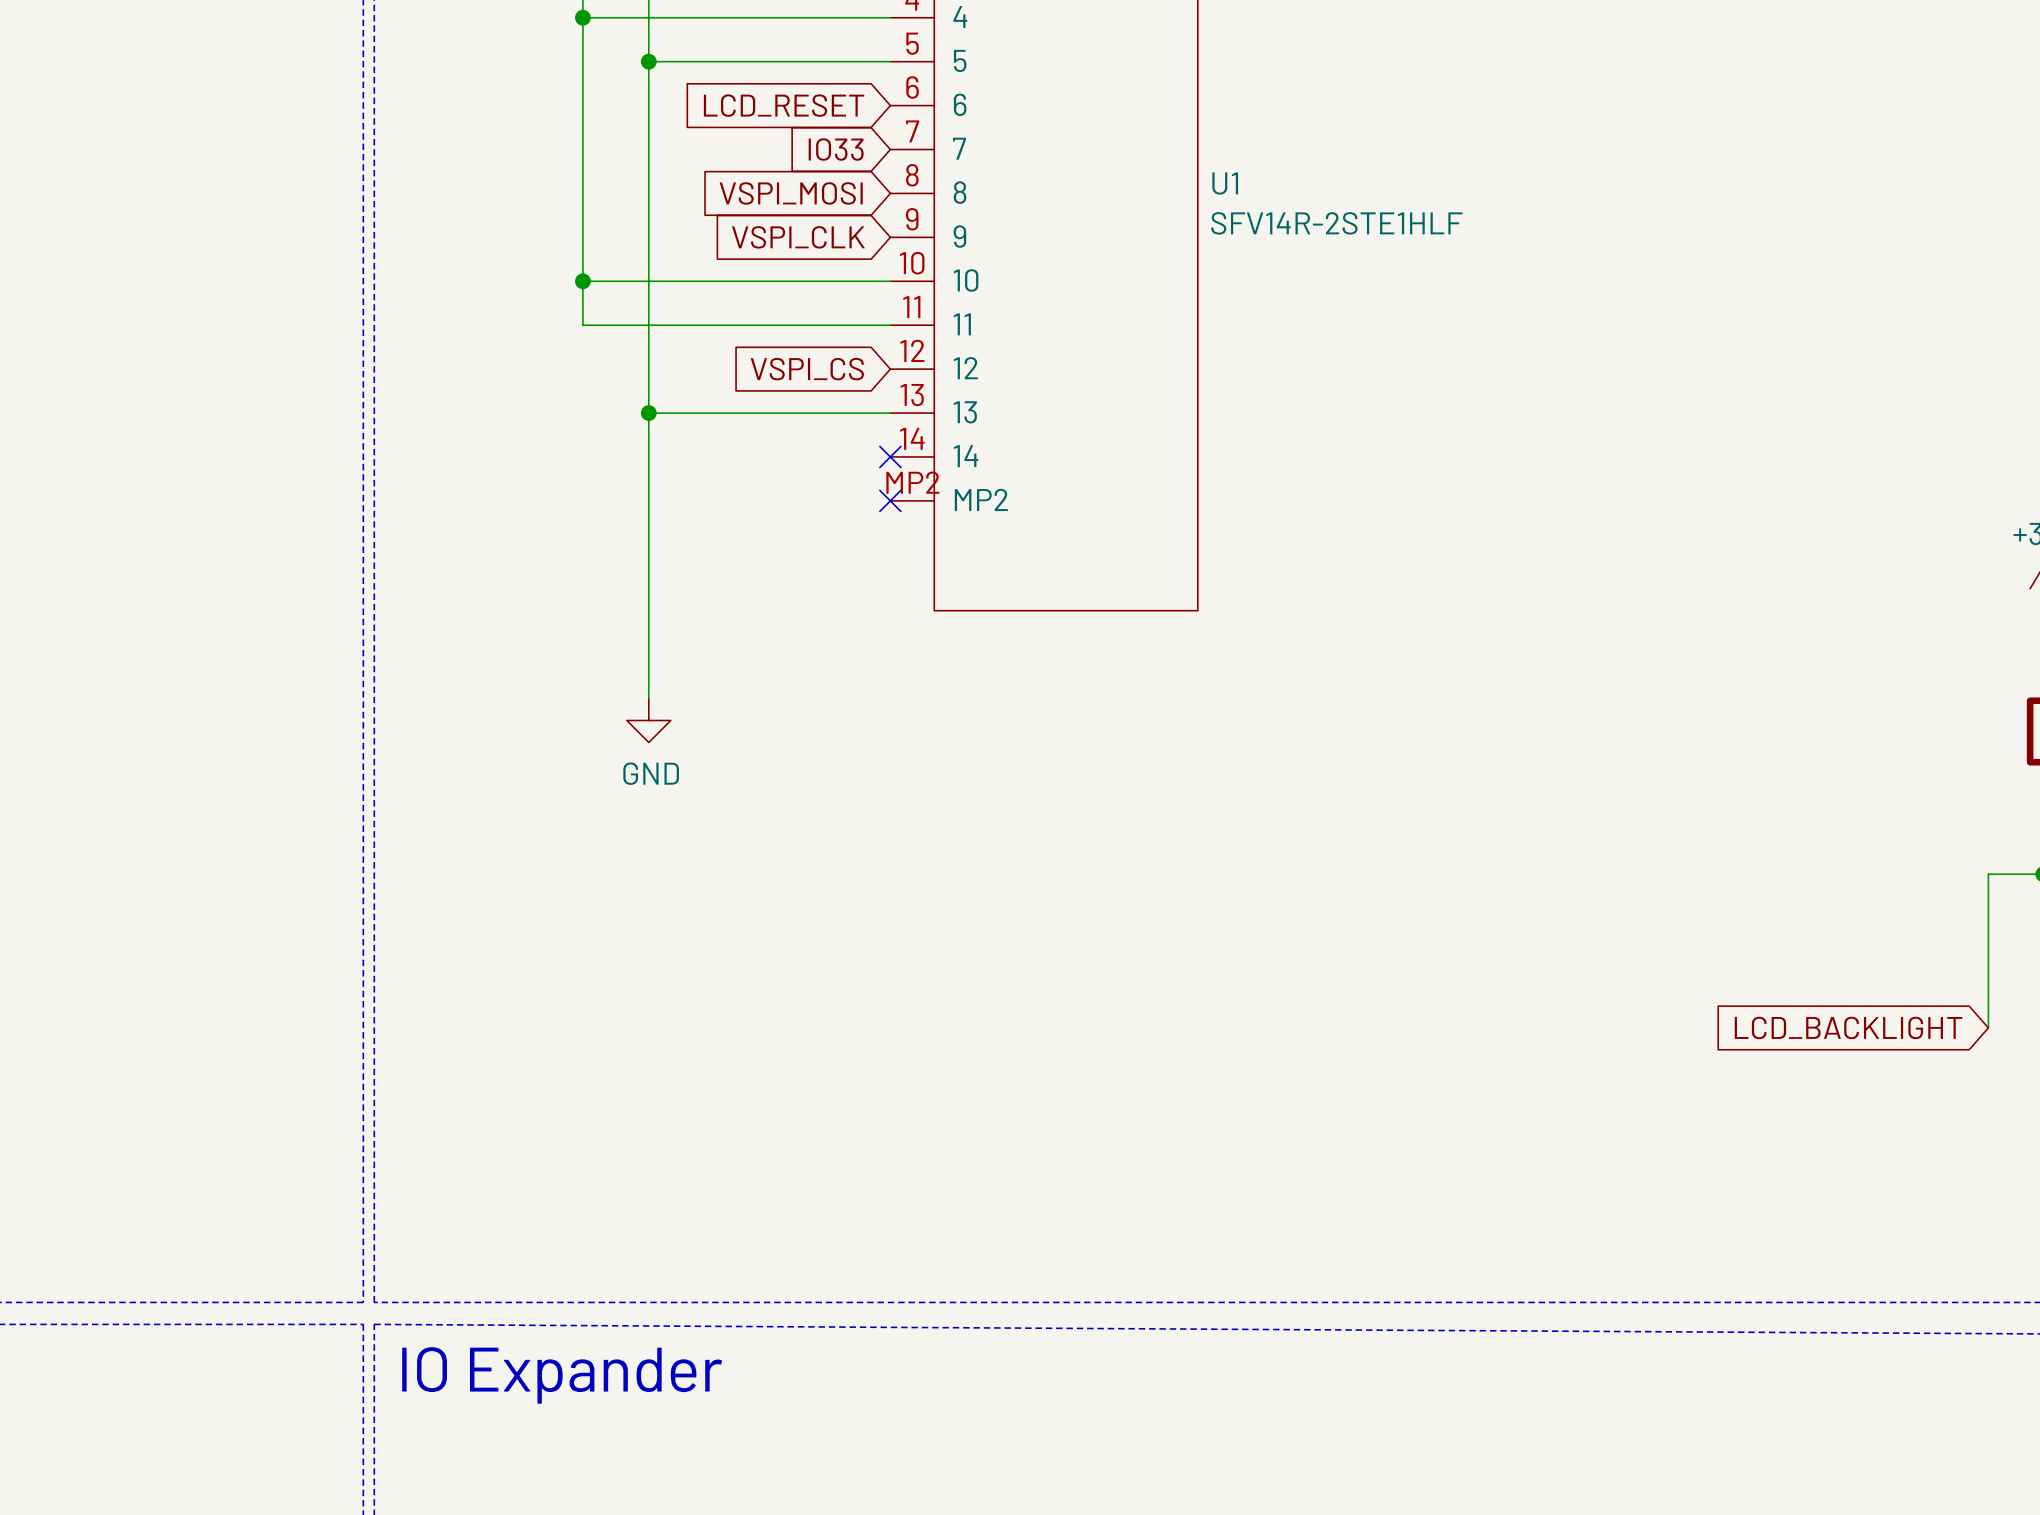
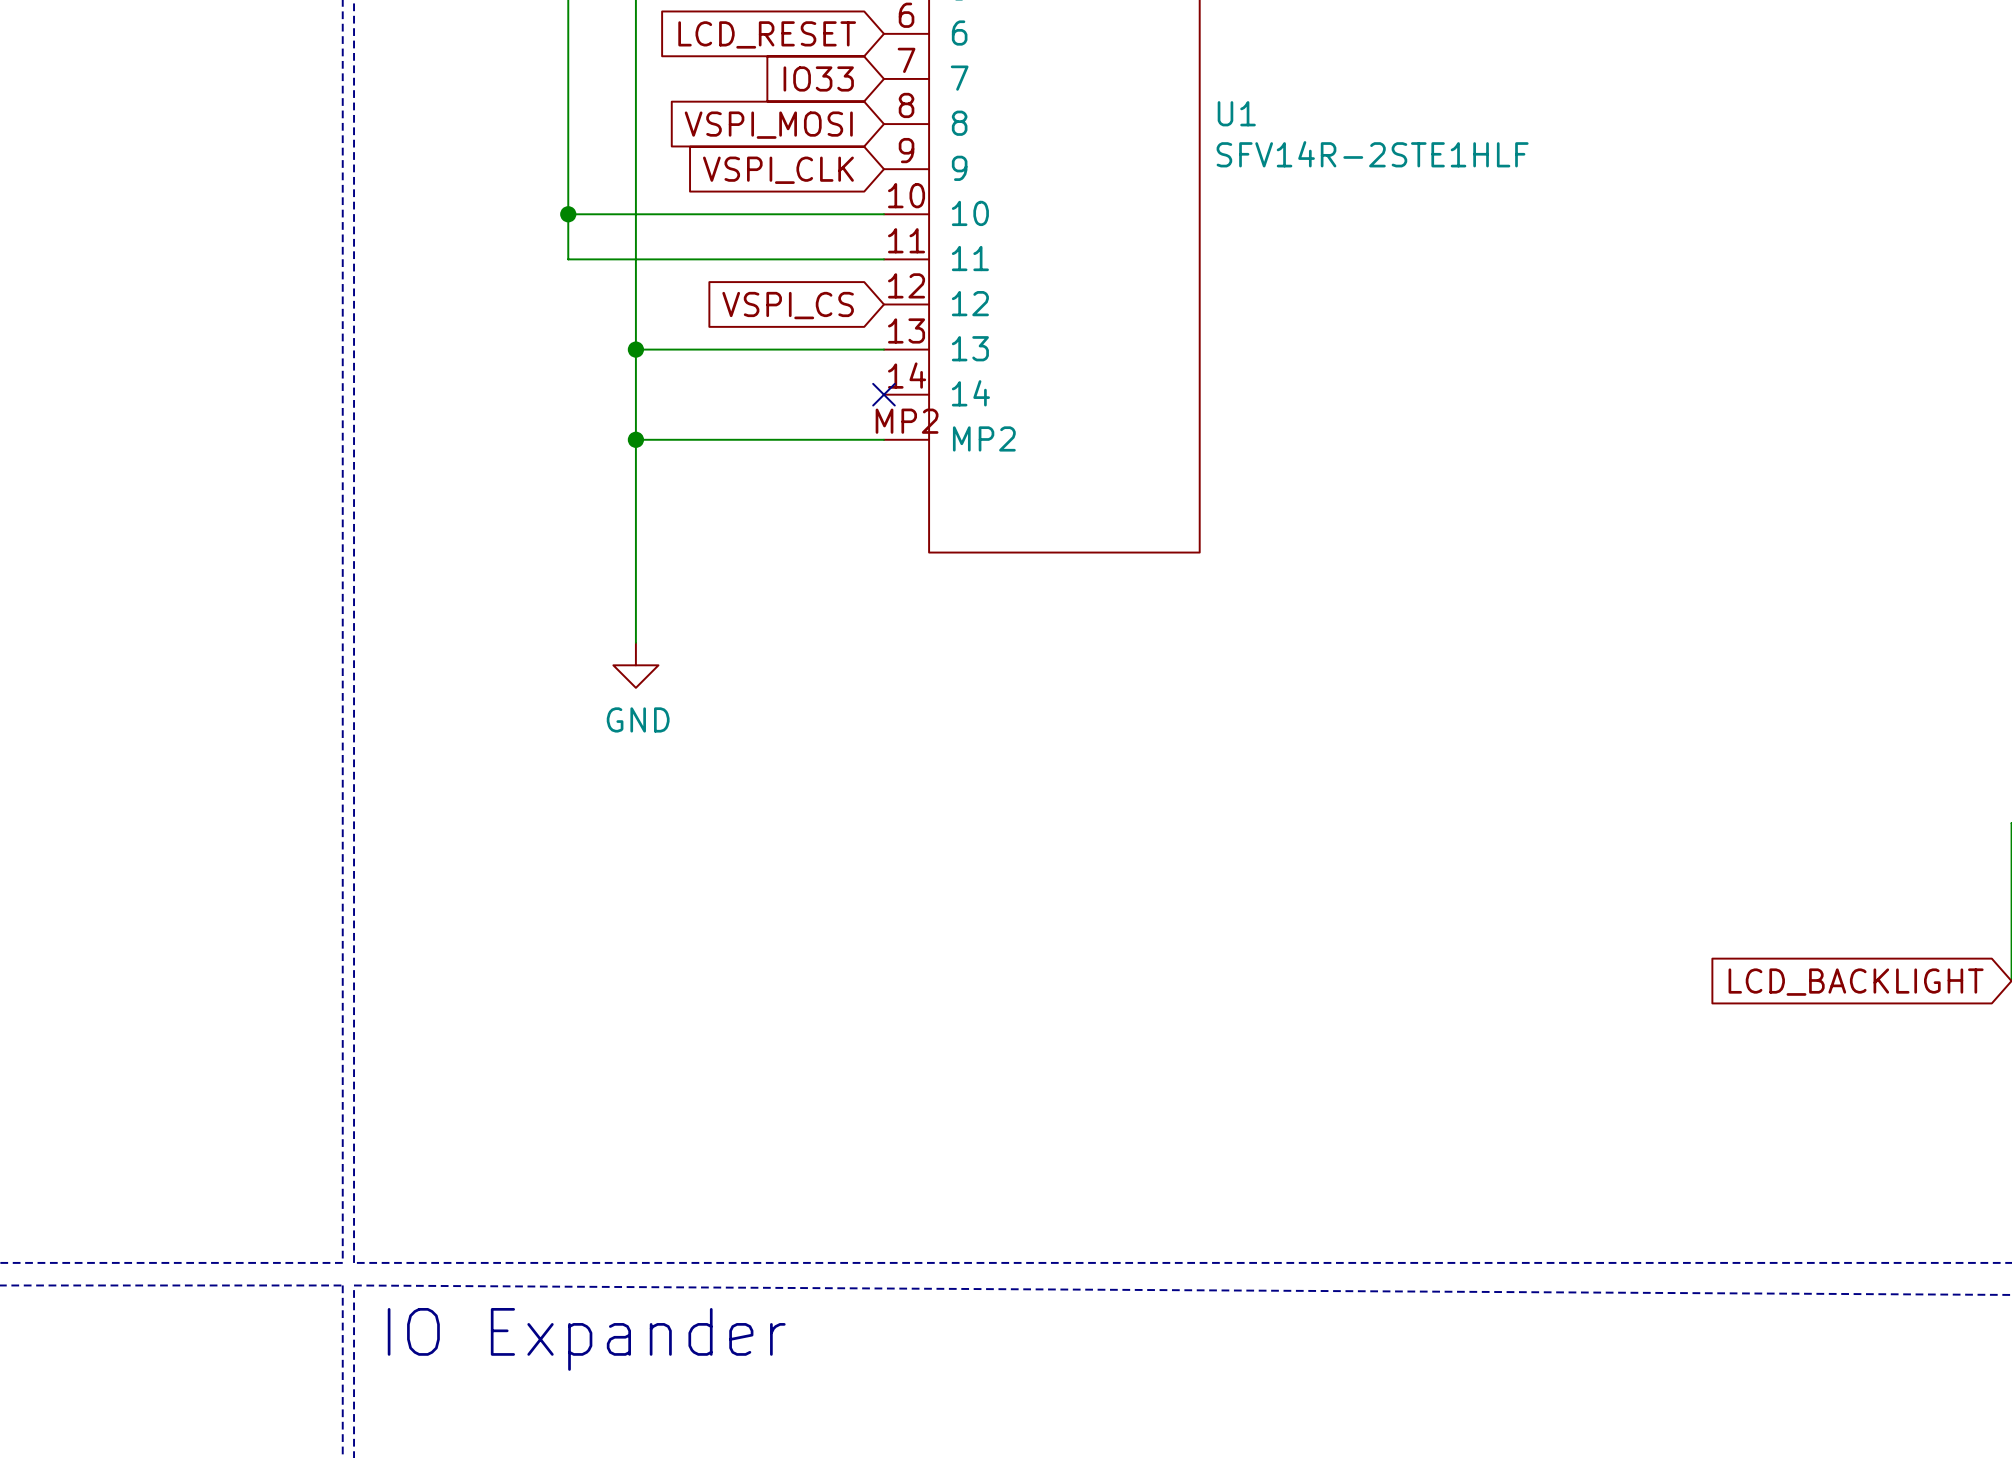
wire: none -> (635, 439) (883, 439)
junction: none -> (635, 439)
no-connect mark: (890, 500) -> none

